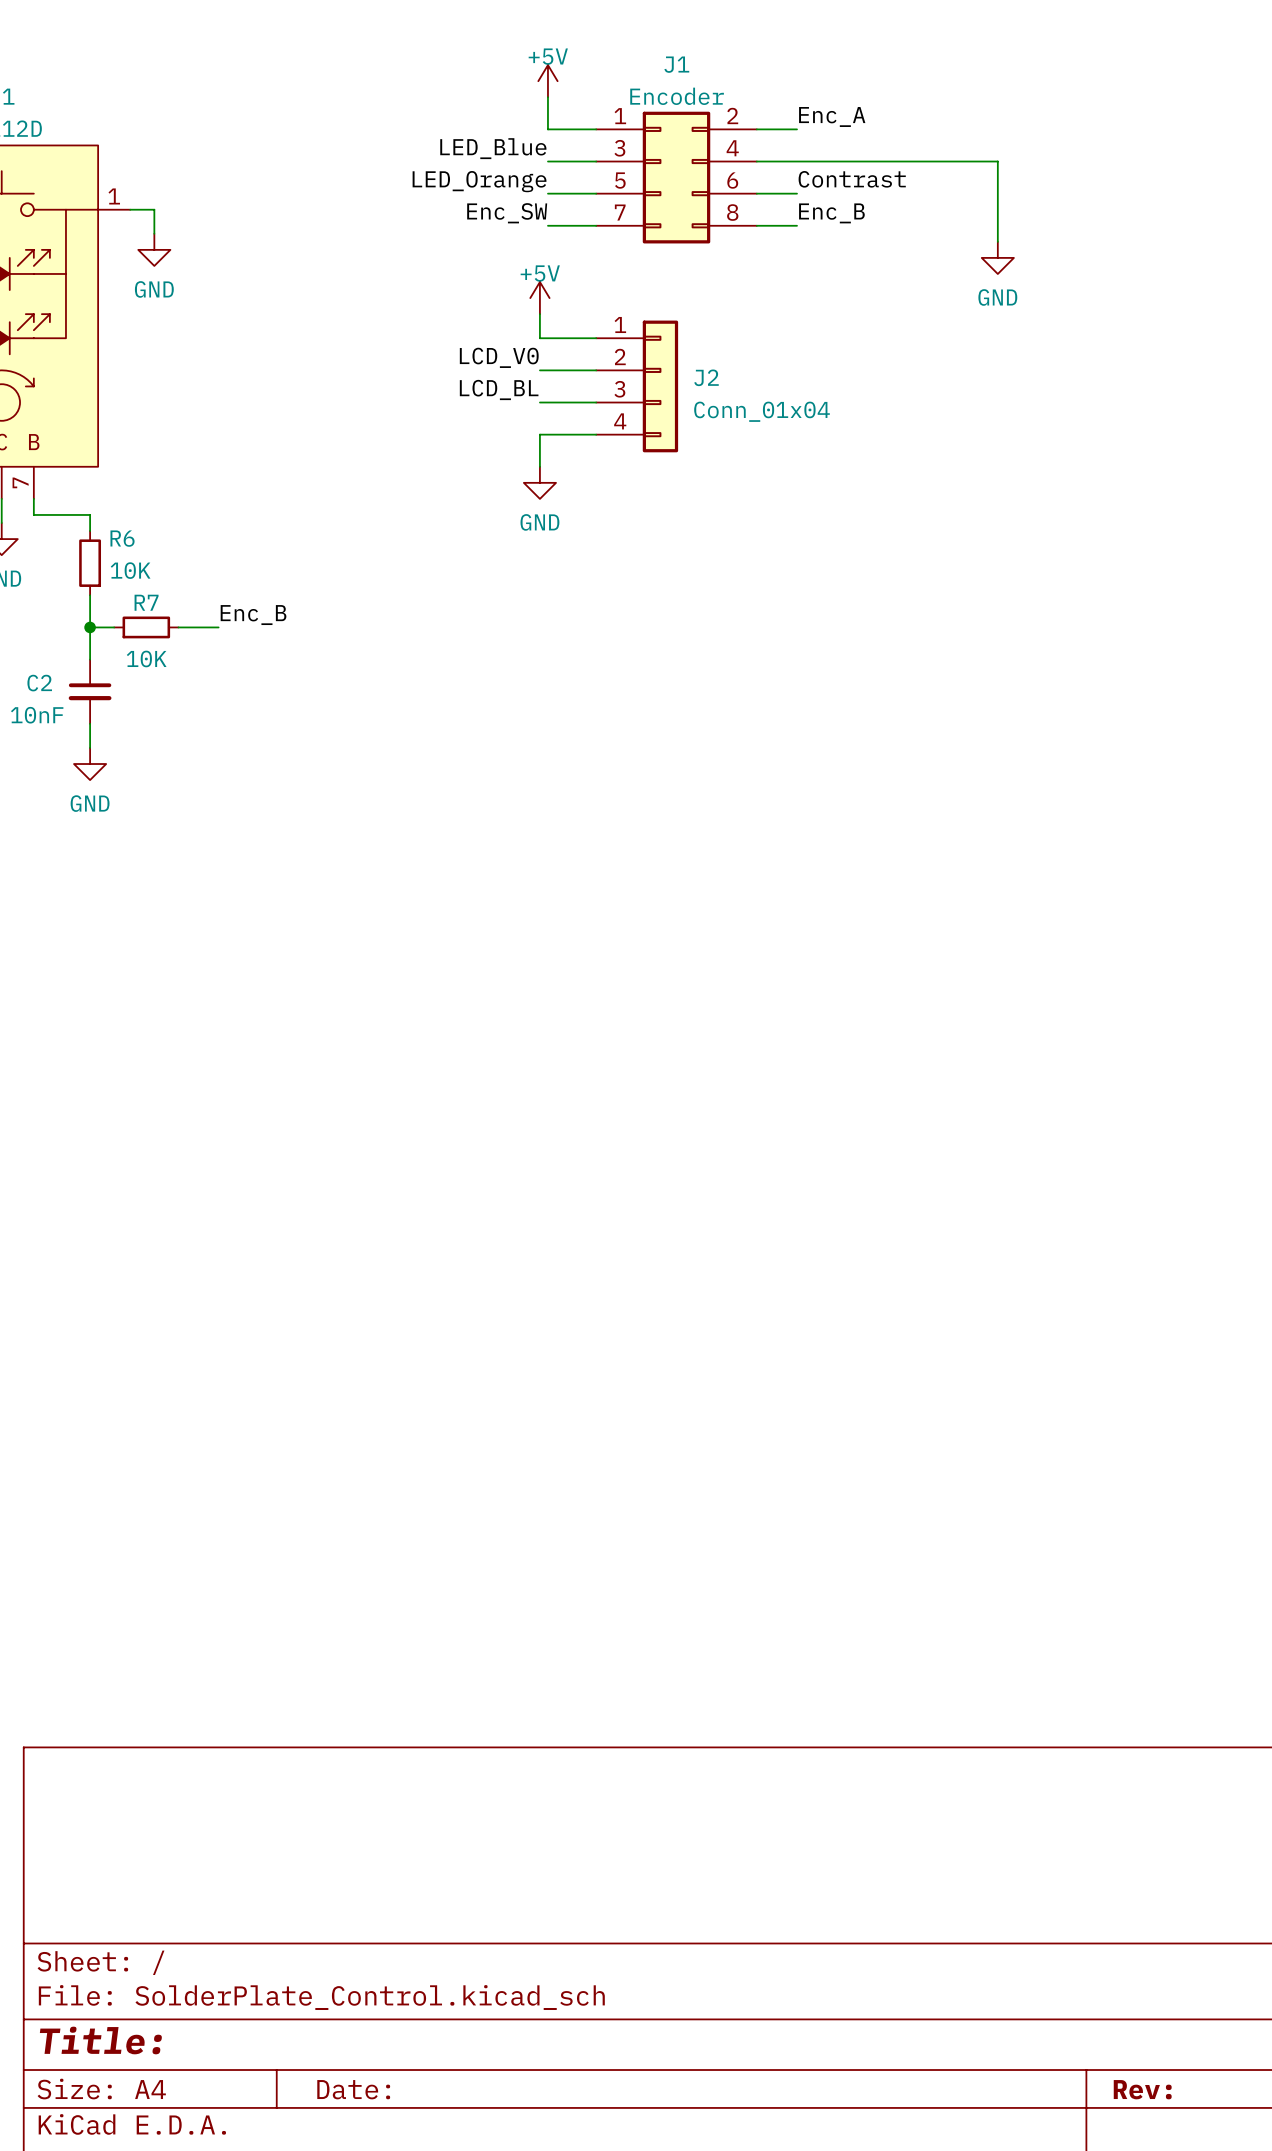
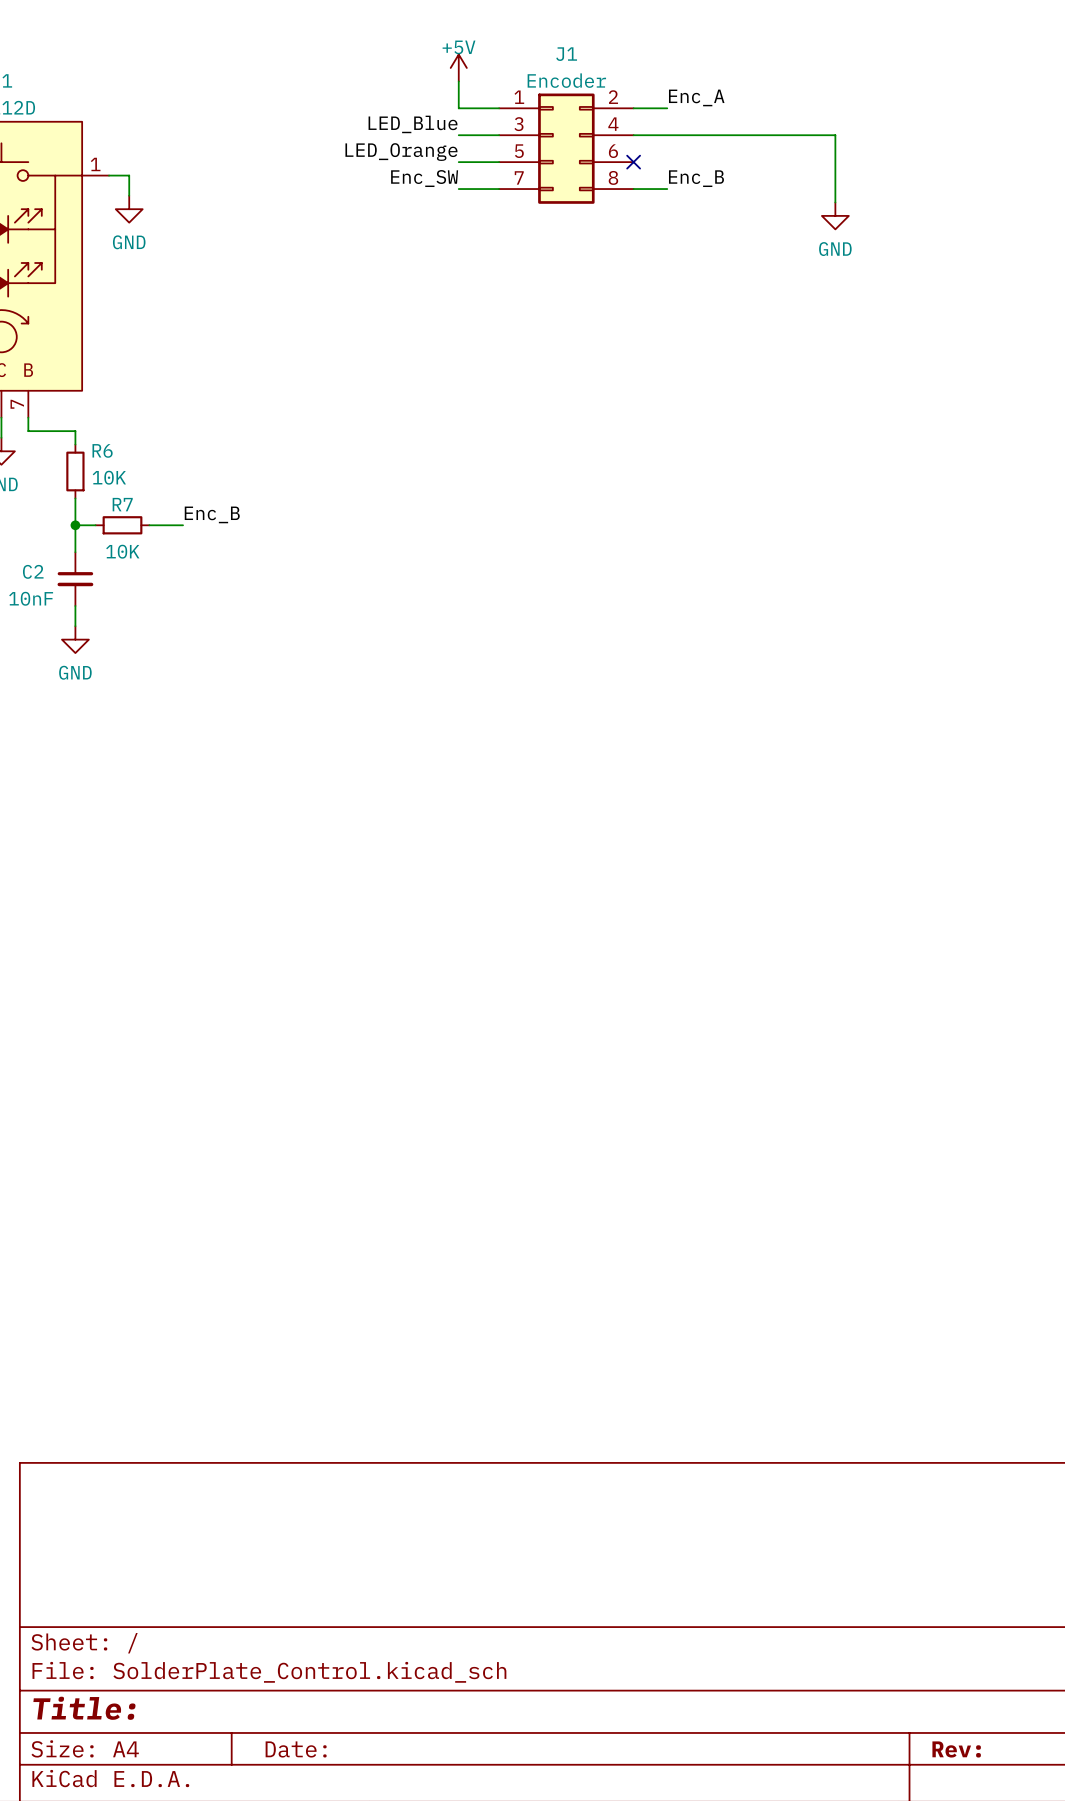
label: Contrast (852, 179) -> none
wire: (756, 193) (797, 193) -> none
no-connect mark: none -> (633, 162)
power symbol: +5V (539, 298) -> none
wire: (539, 314) (539, 338) (596, 338) -> none
label: LCD_V0 (499, 357) -> none
wire: (539, 370) (596, 370) -> none
J2: Conn_01x04 (637, 386) -> none
label: LCD_BL (499, 389) -> none
wire: (539, 402) (596, 402) -> none
wire: (596, 434) (539, 434) (539, 466) -> none
power symbol: GND (539, 482) -> none

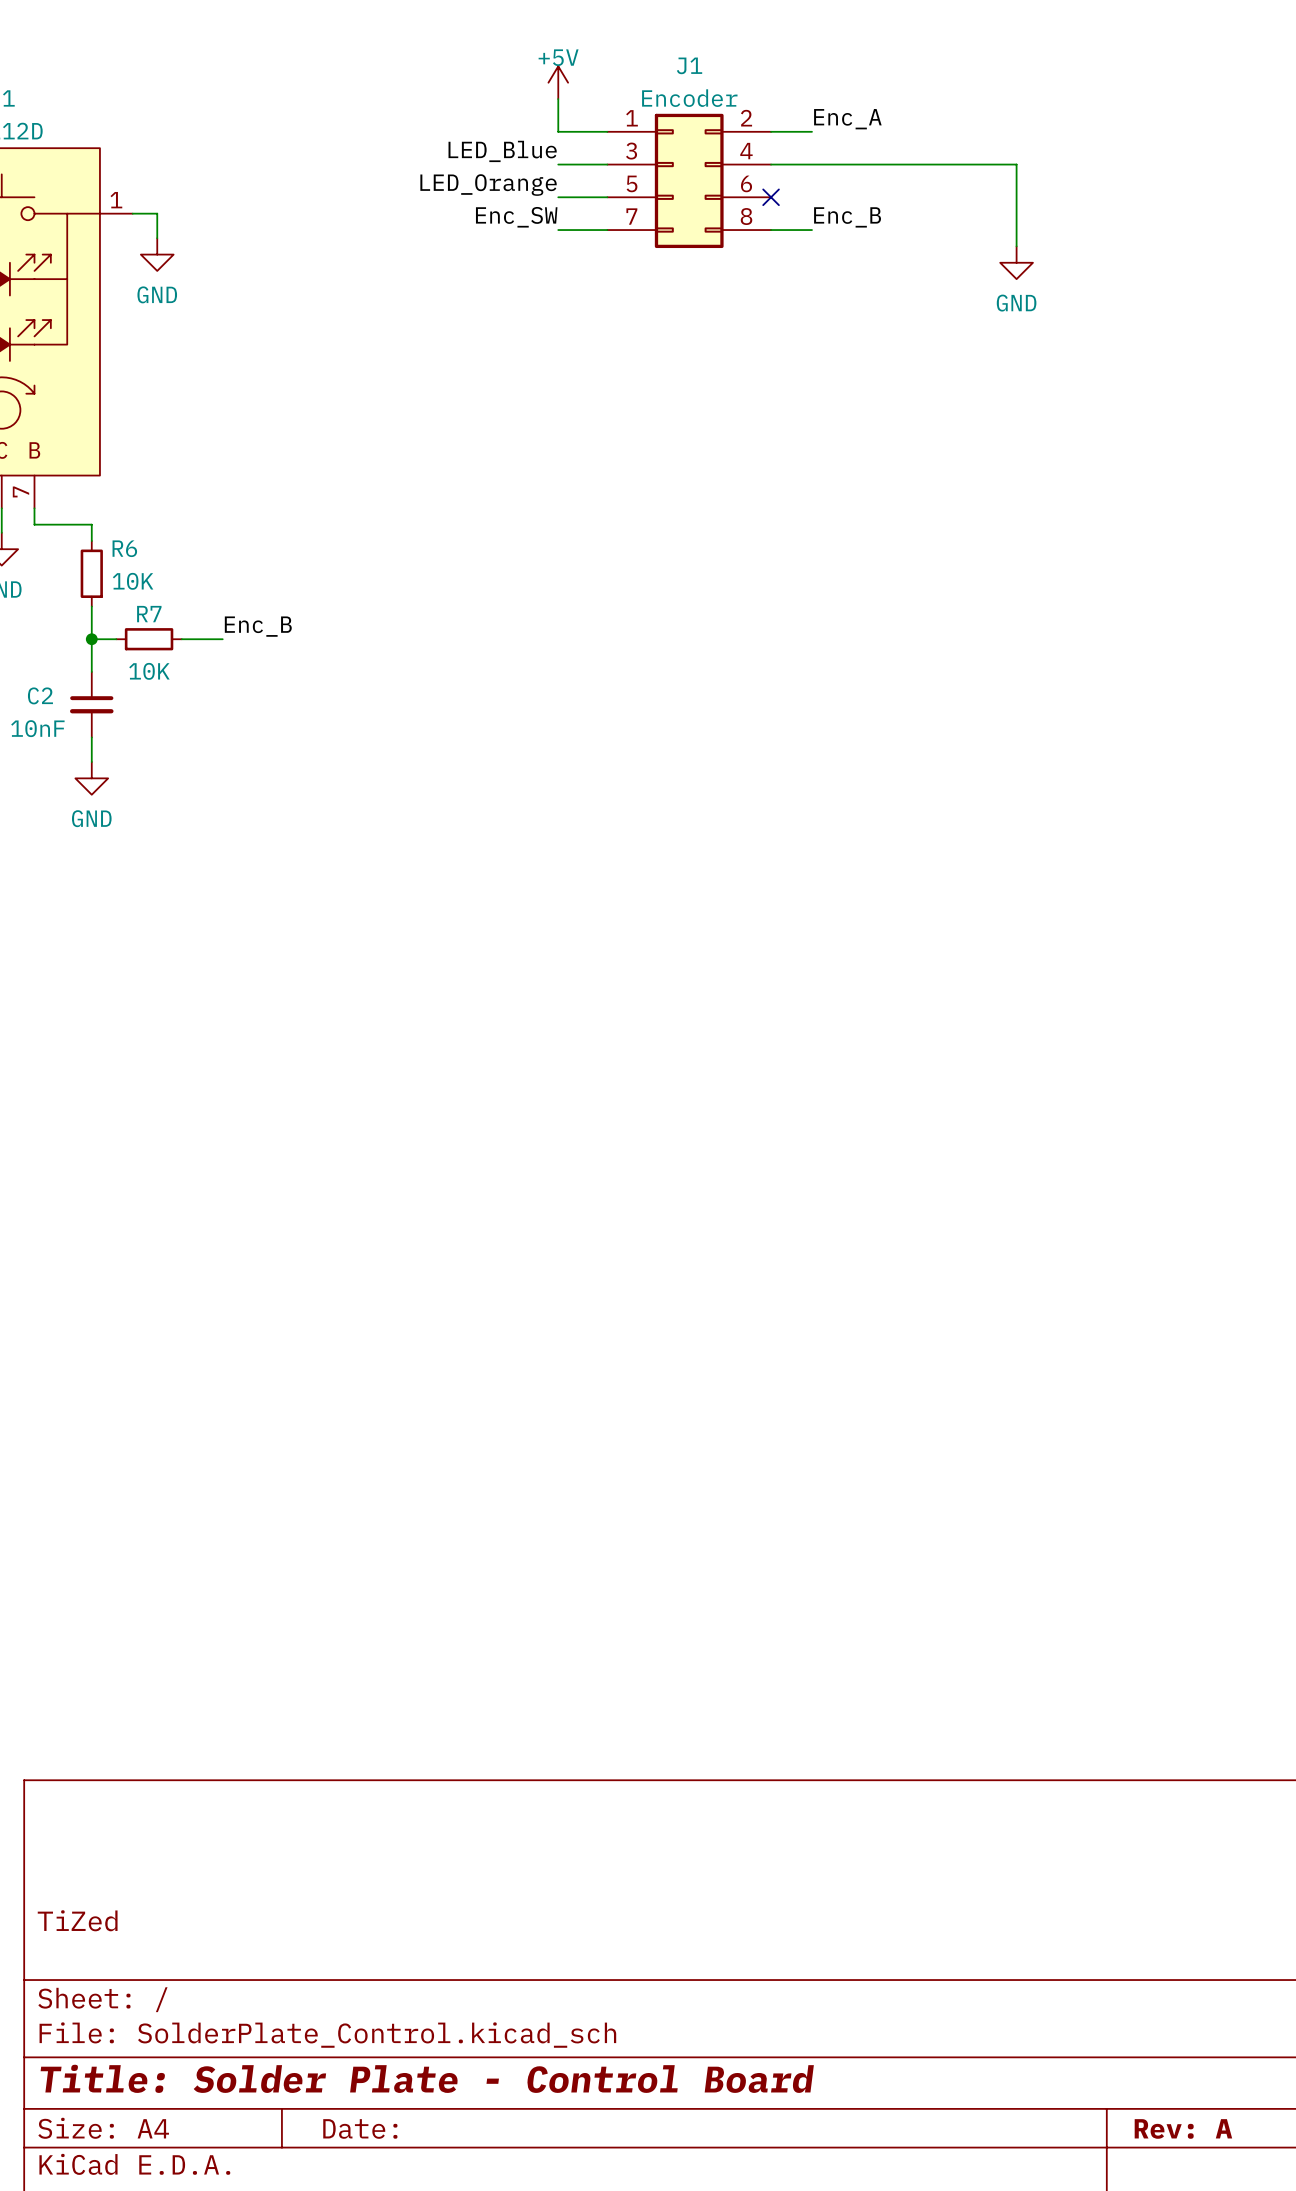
title block: none -> TiZed (77, 1920)
title block: Title: (84, 1708) -> Title: Solder Plate - Control Board (427, 2078)
title block: Rev: (956, 1749) -> Rev: A (1183, 2128)

